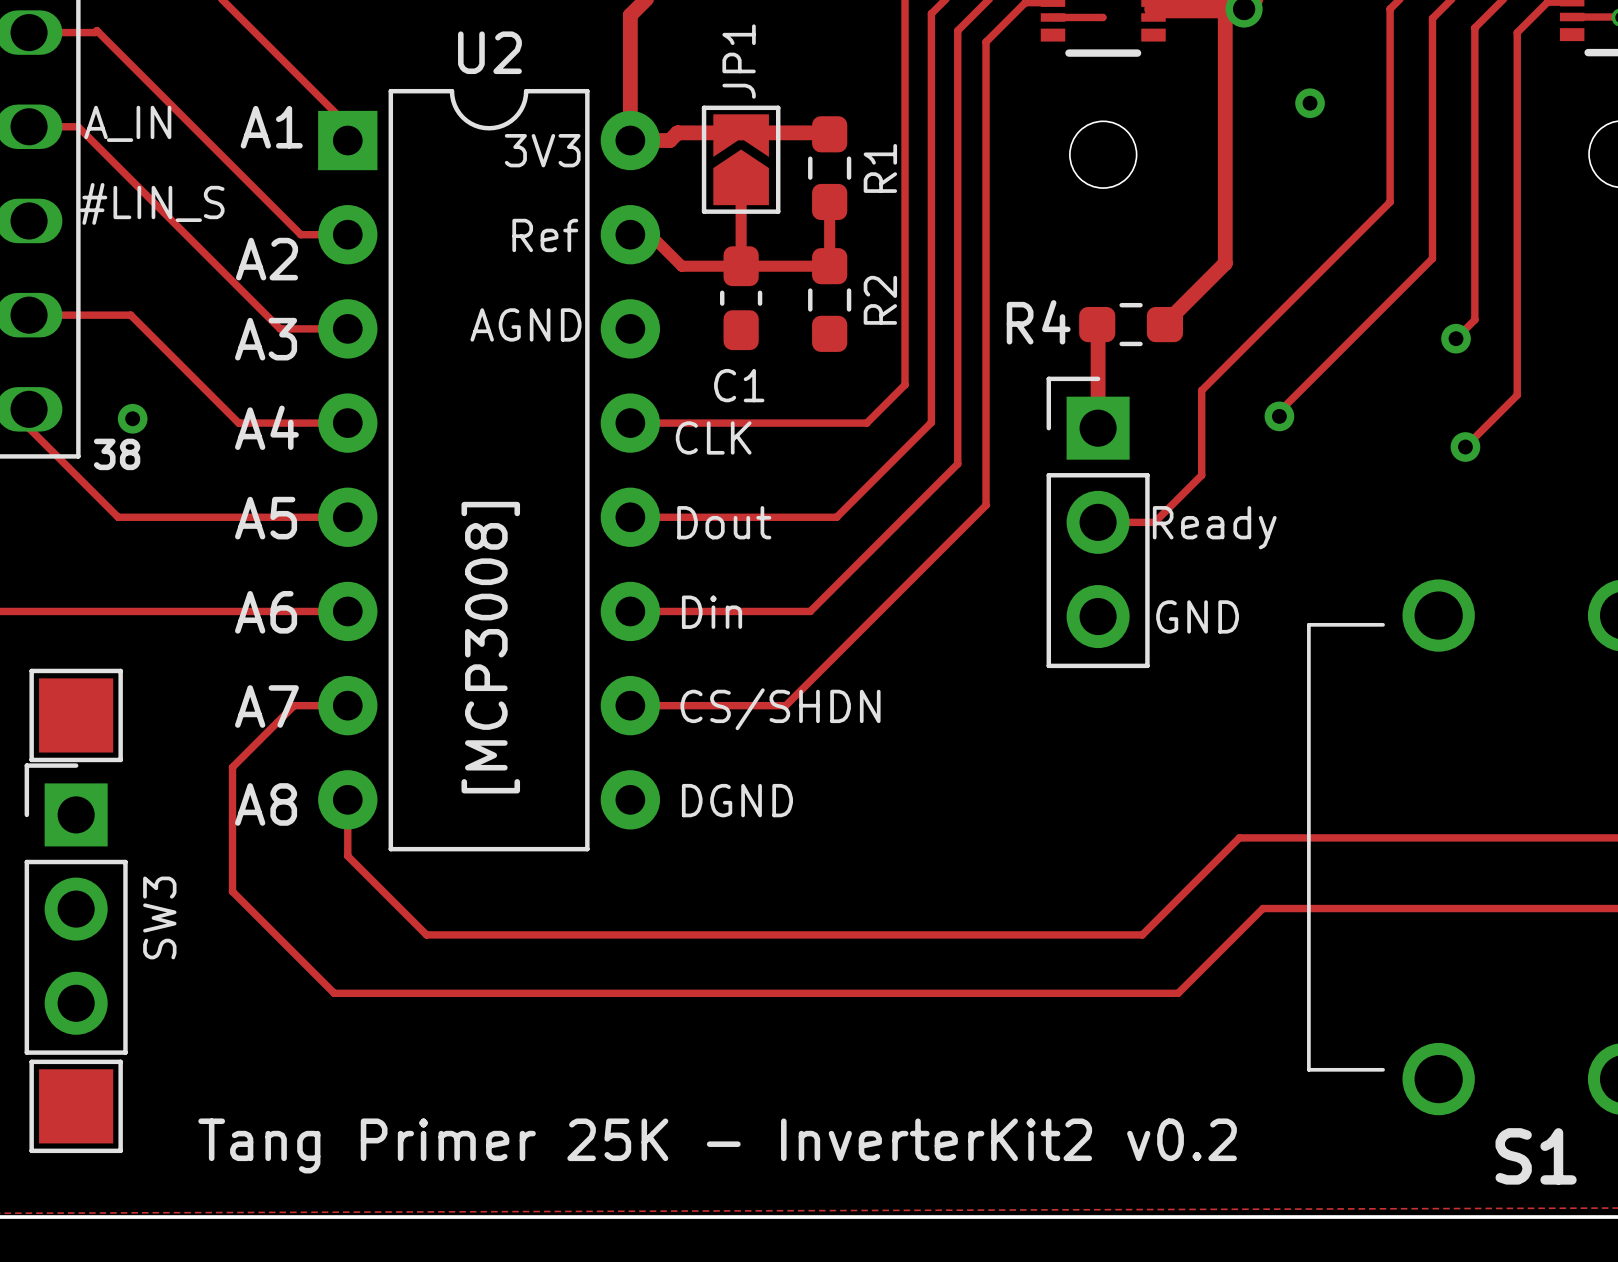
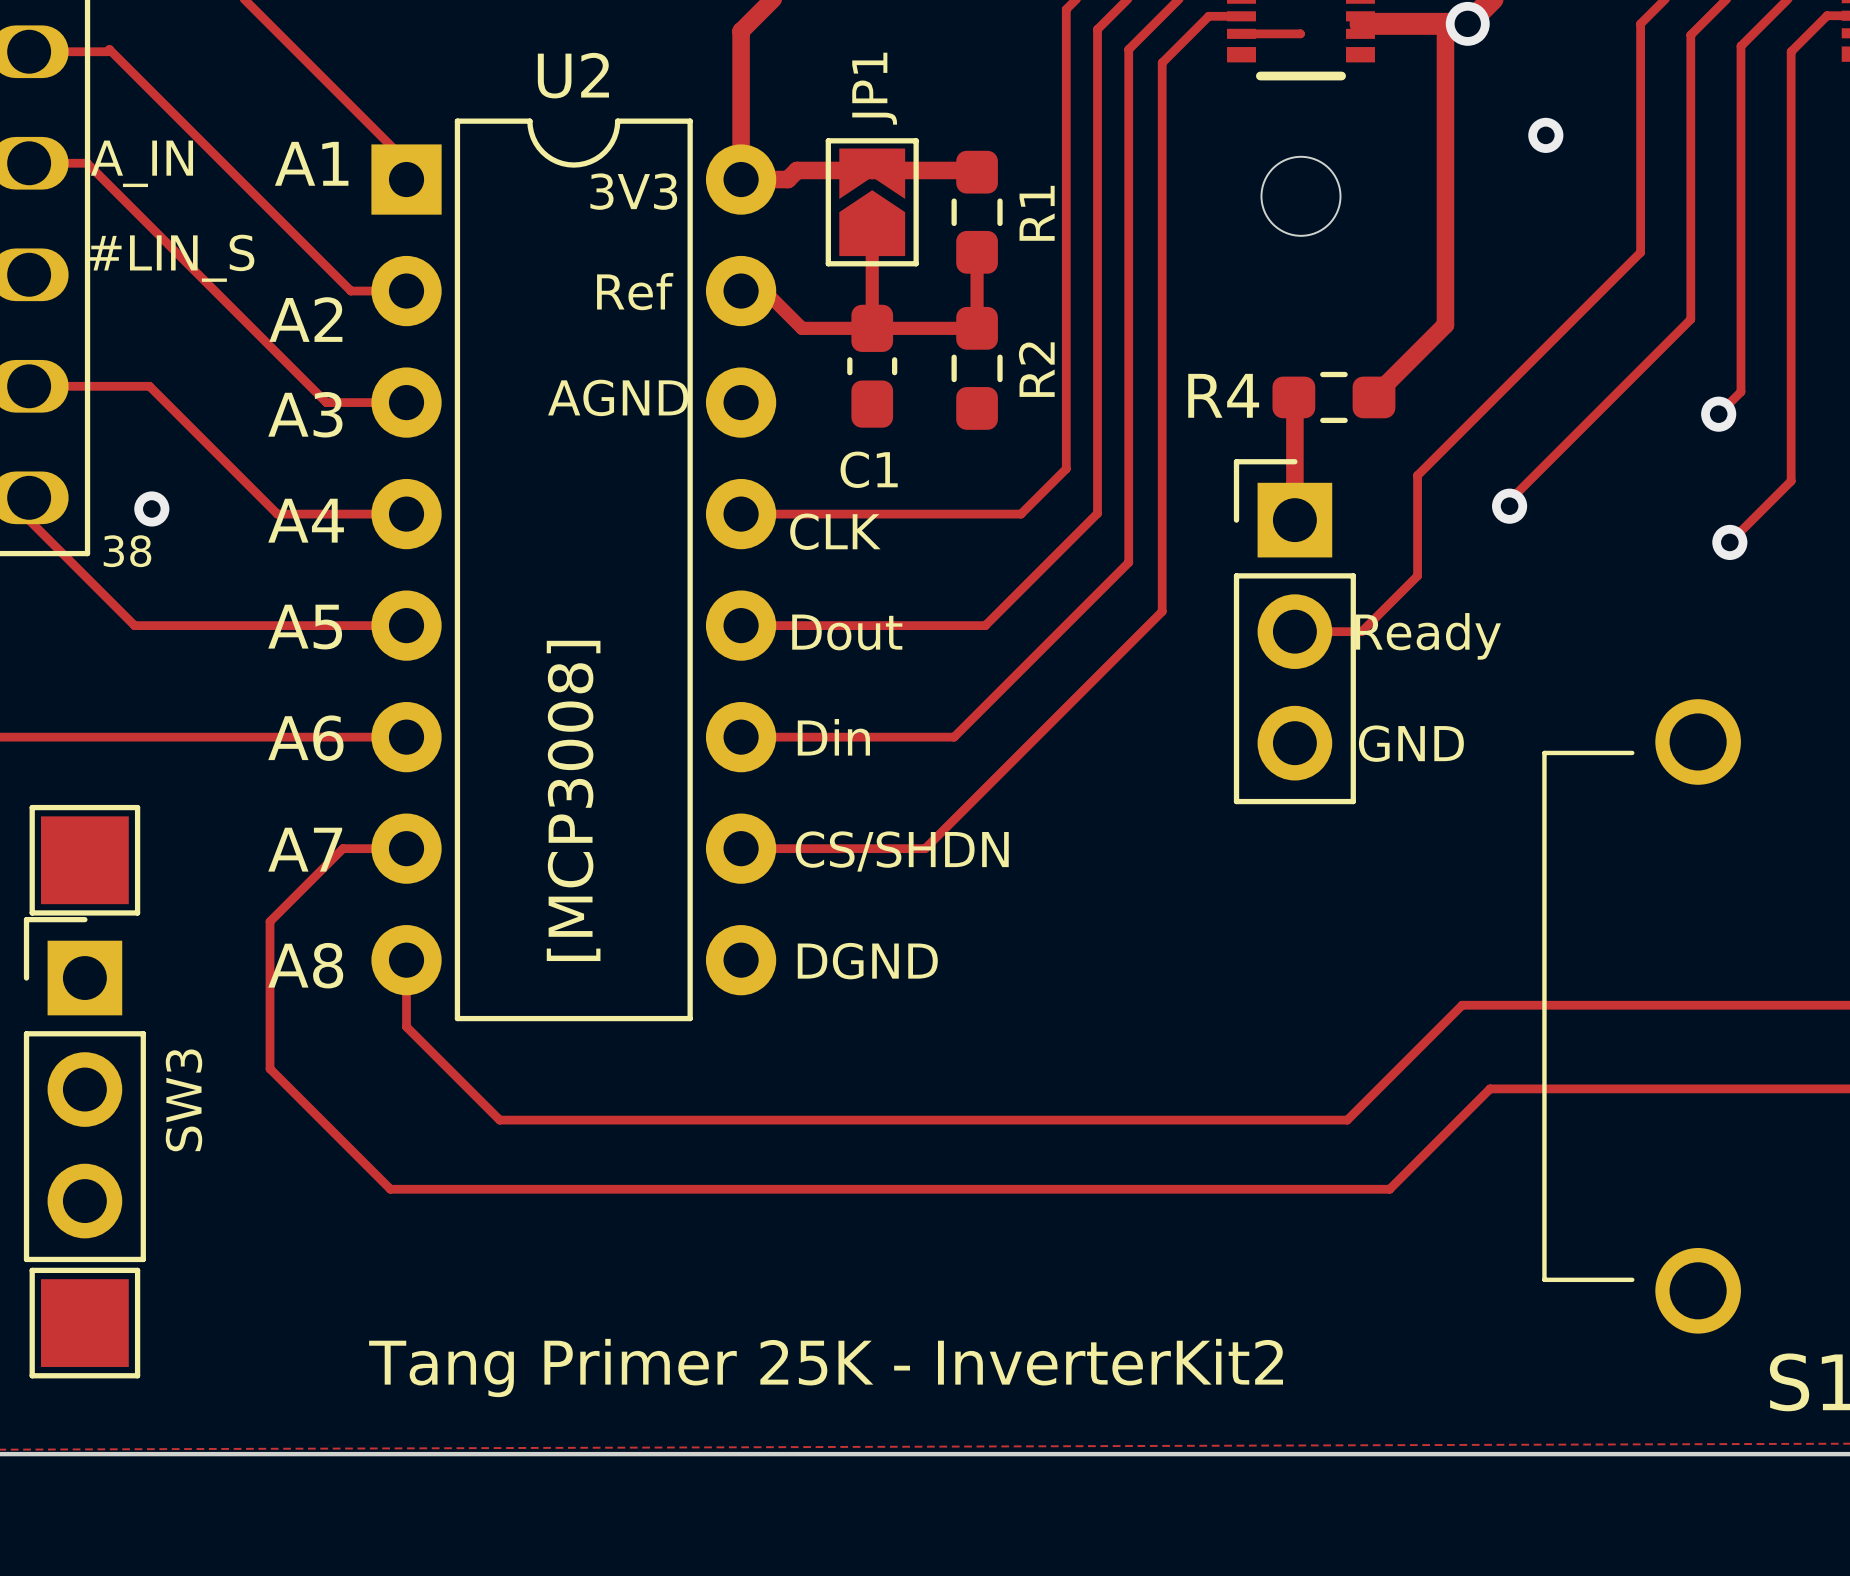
text: Tang Primer 25K - InverterKit2 v0.2 (717, 1145) -> Tang Primer 25K - InverterKit2 (826, 1368)

